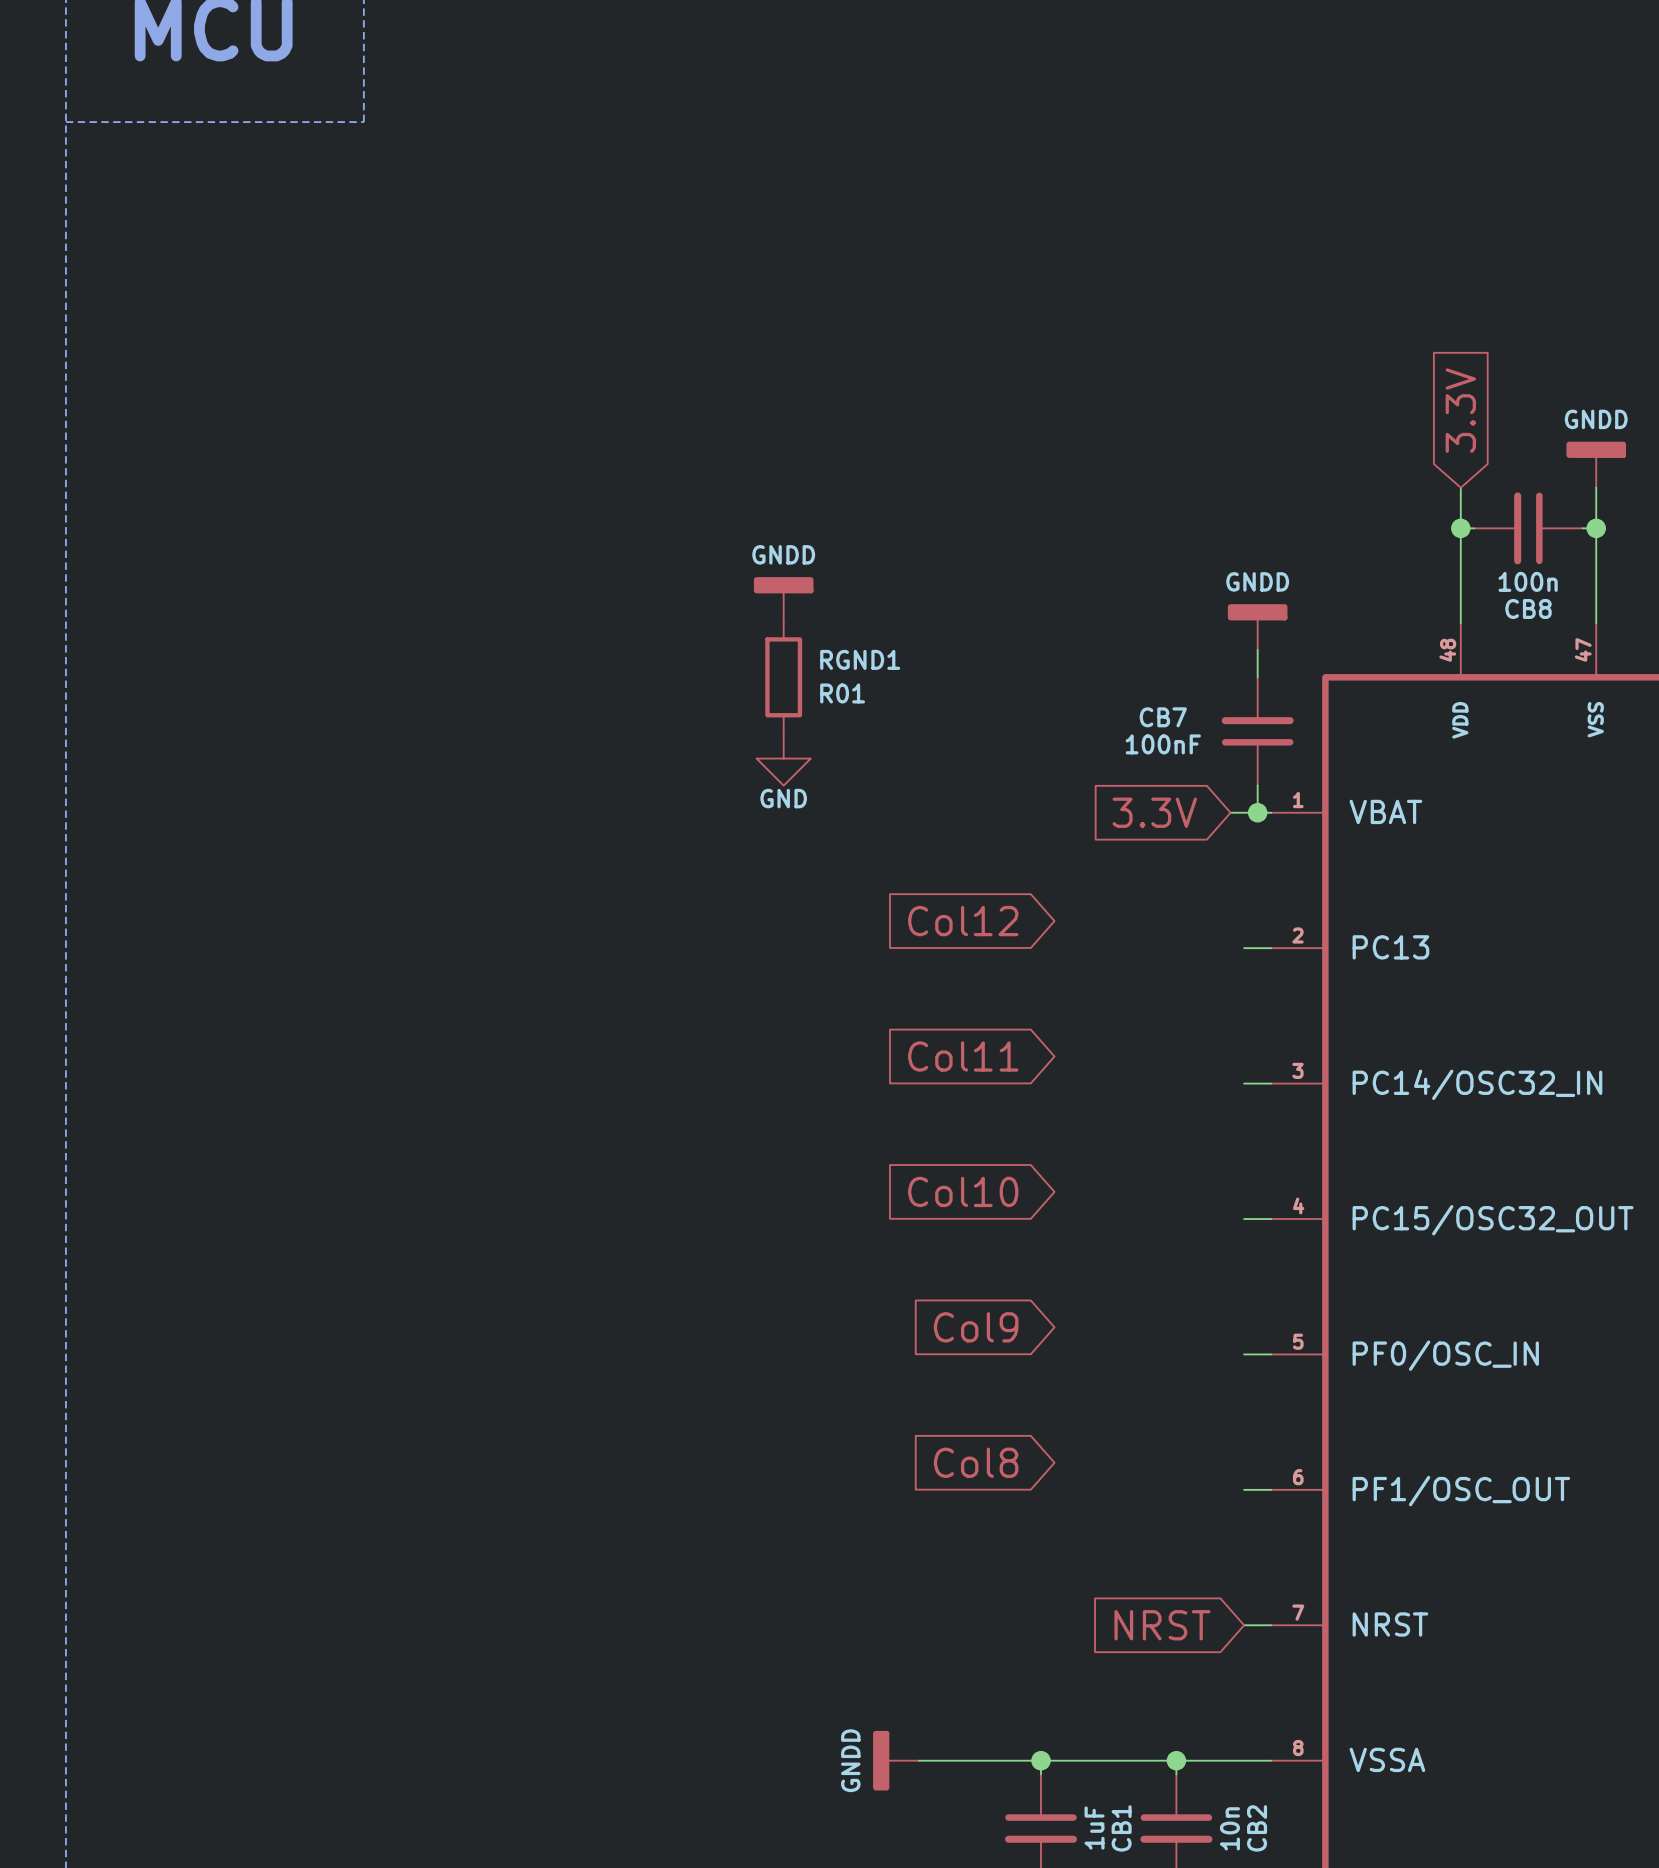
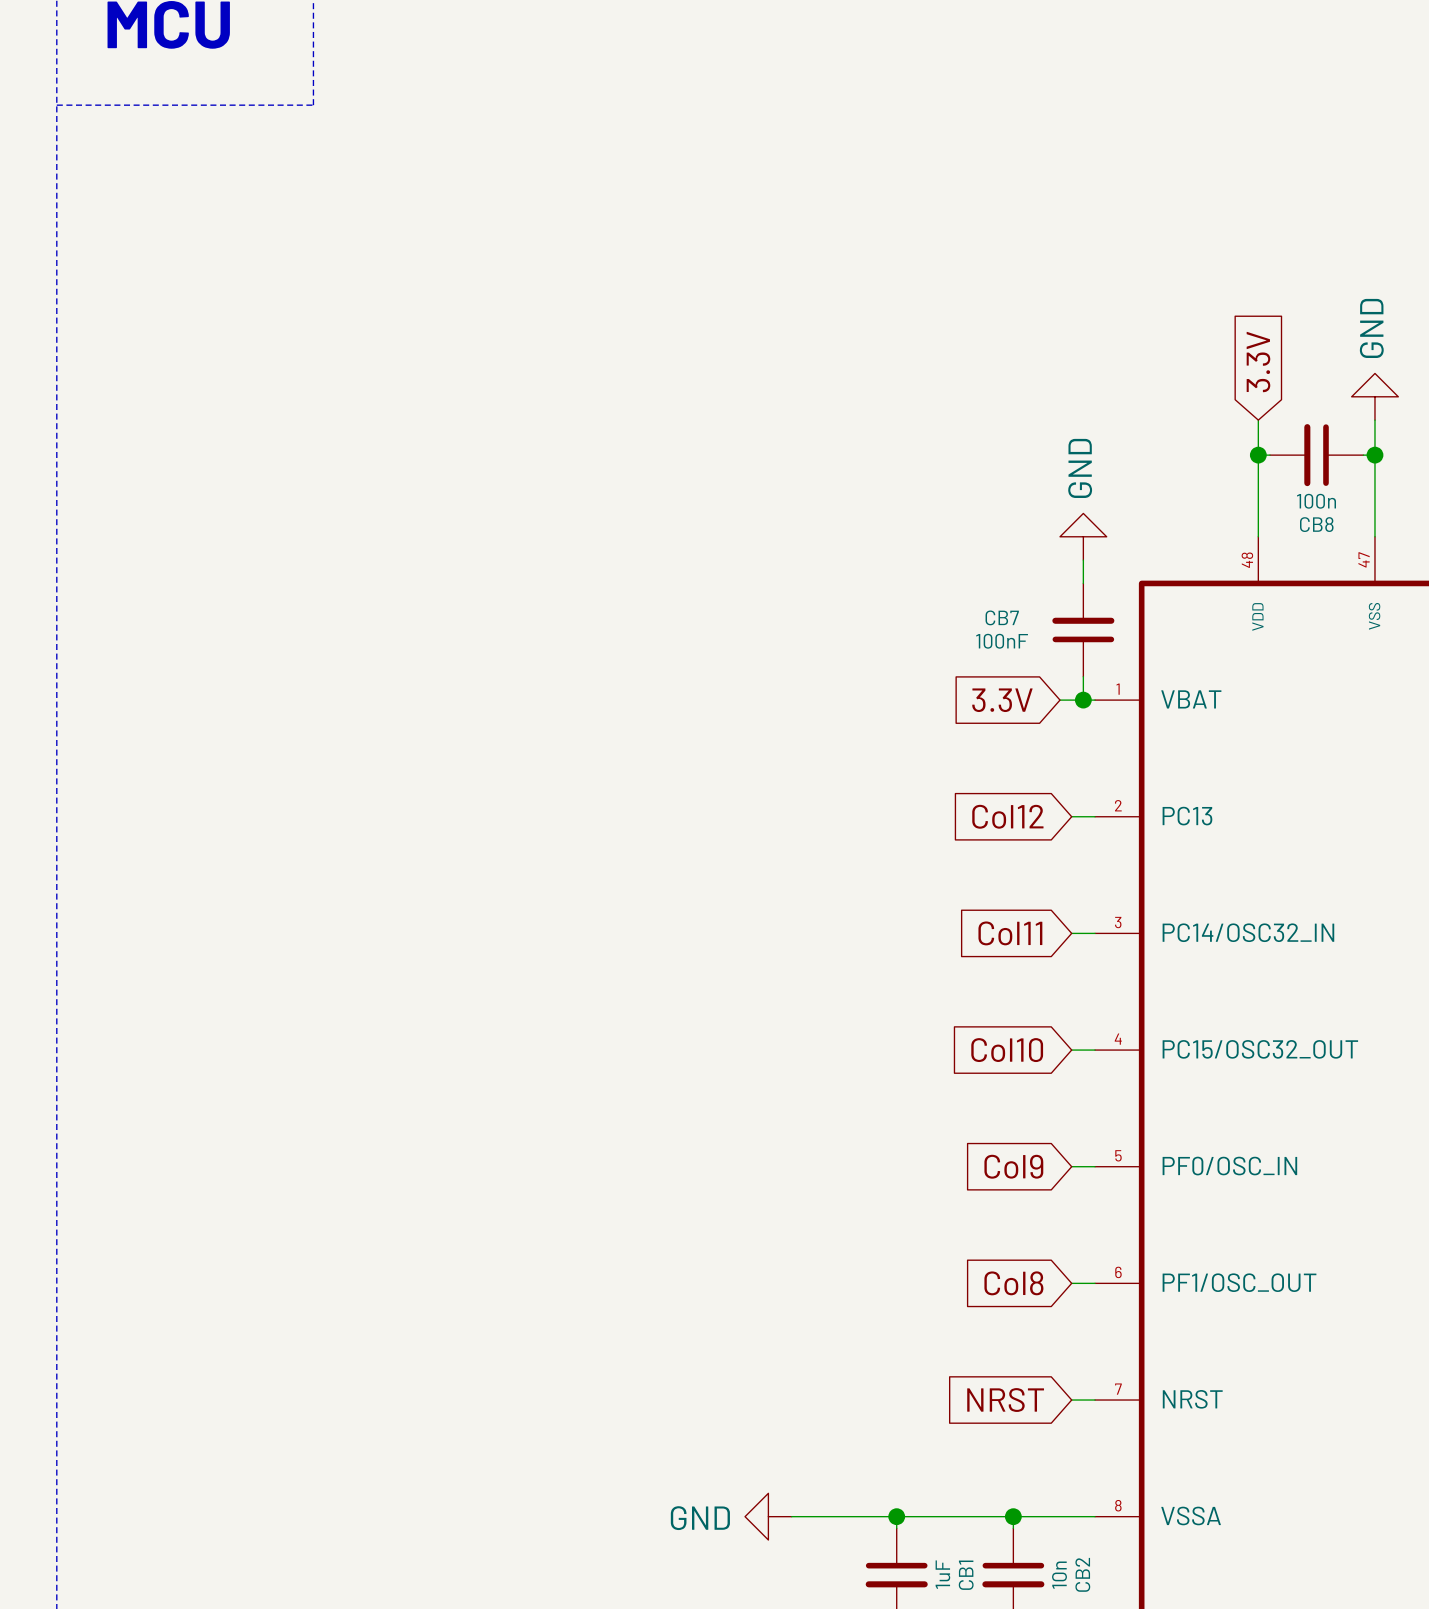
power symbol: GNDD (1596, 464) -> GND (1374, 396)
power symbol: GNDD (783, 600) -> none
power symbol: GNDD (1257, 627) -> GND (1083, 536)
RGND1: R01 (783, 677) -> none
power symbol: GND (783, 758) -> none
global label position: Col12 (963, 921) -> Col12 (1007, 816)
global label position: Col11 (963, 1056) -> Col11 (1010, 933)
global label position: Col10 (963, 1191) -> Col10 (1007, 1050)
global label position: Col9 (976, 1327) -> Col9 (1013, 1166)
global label position: Col8 (976, 1462) -> Col8 (1013, 1283)
power symbol: GNDD (896, 1760) -> GND (768, 1516)

